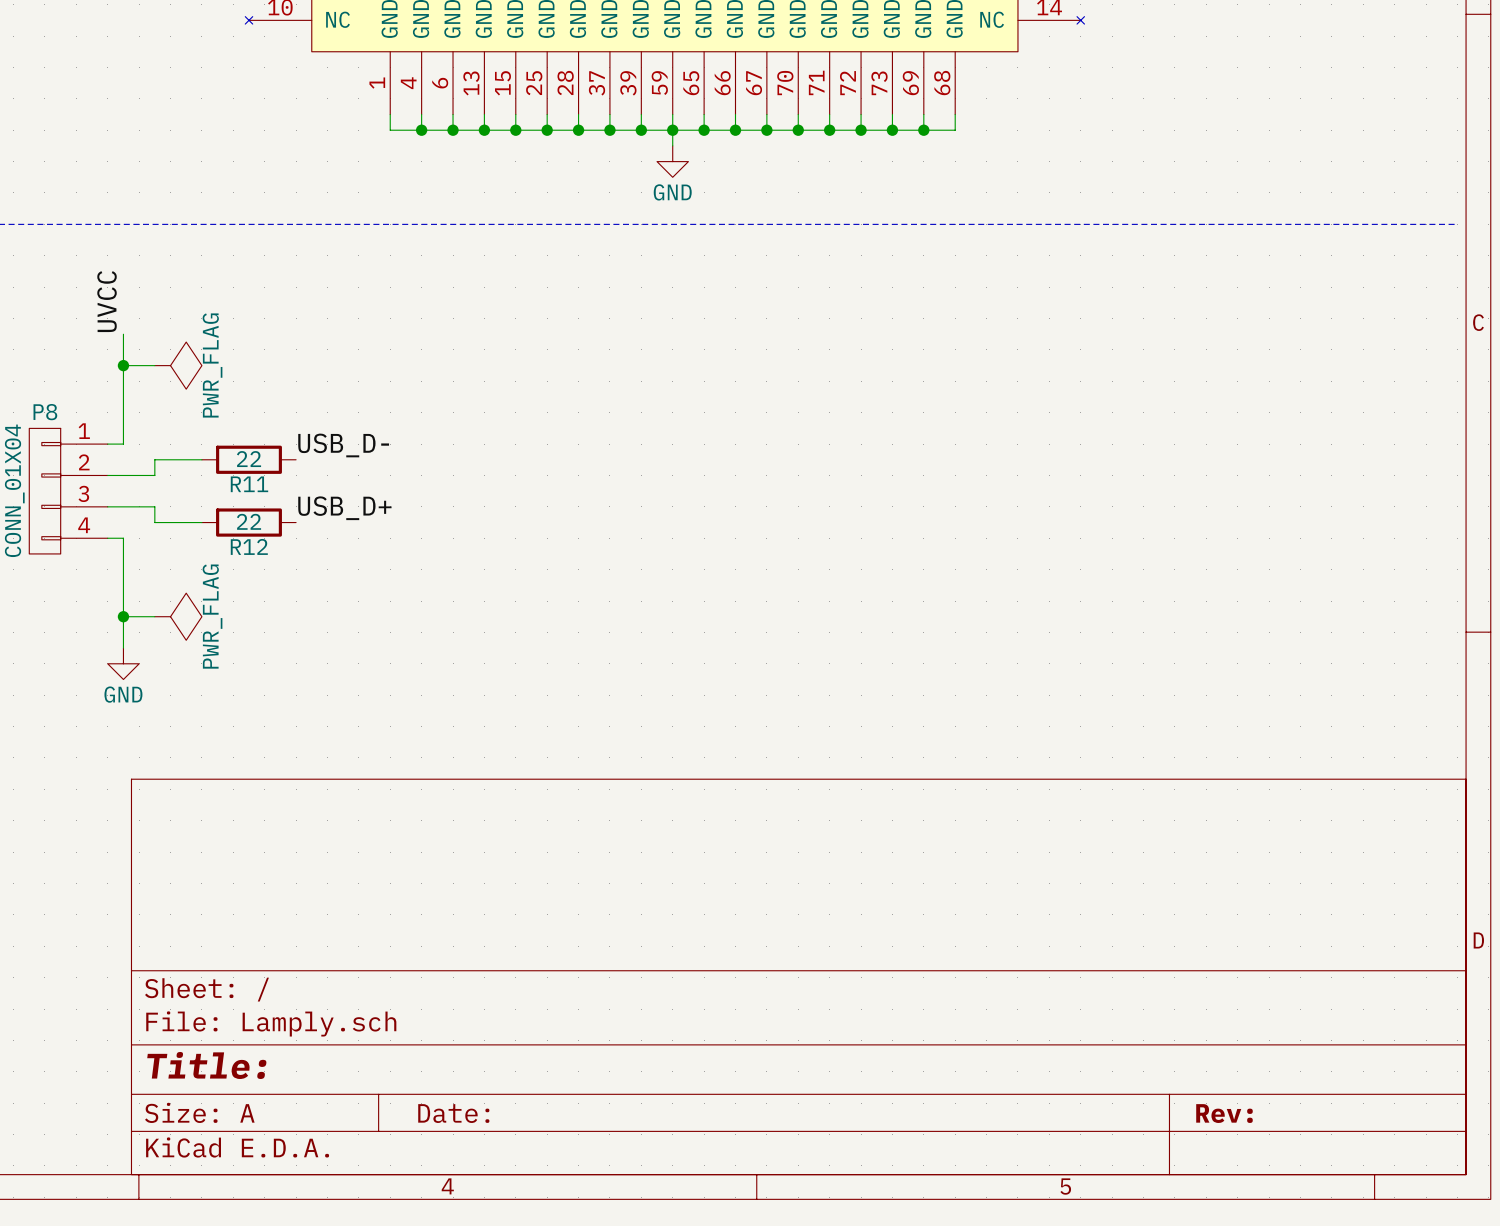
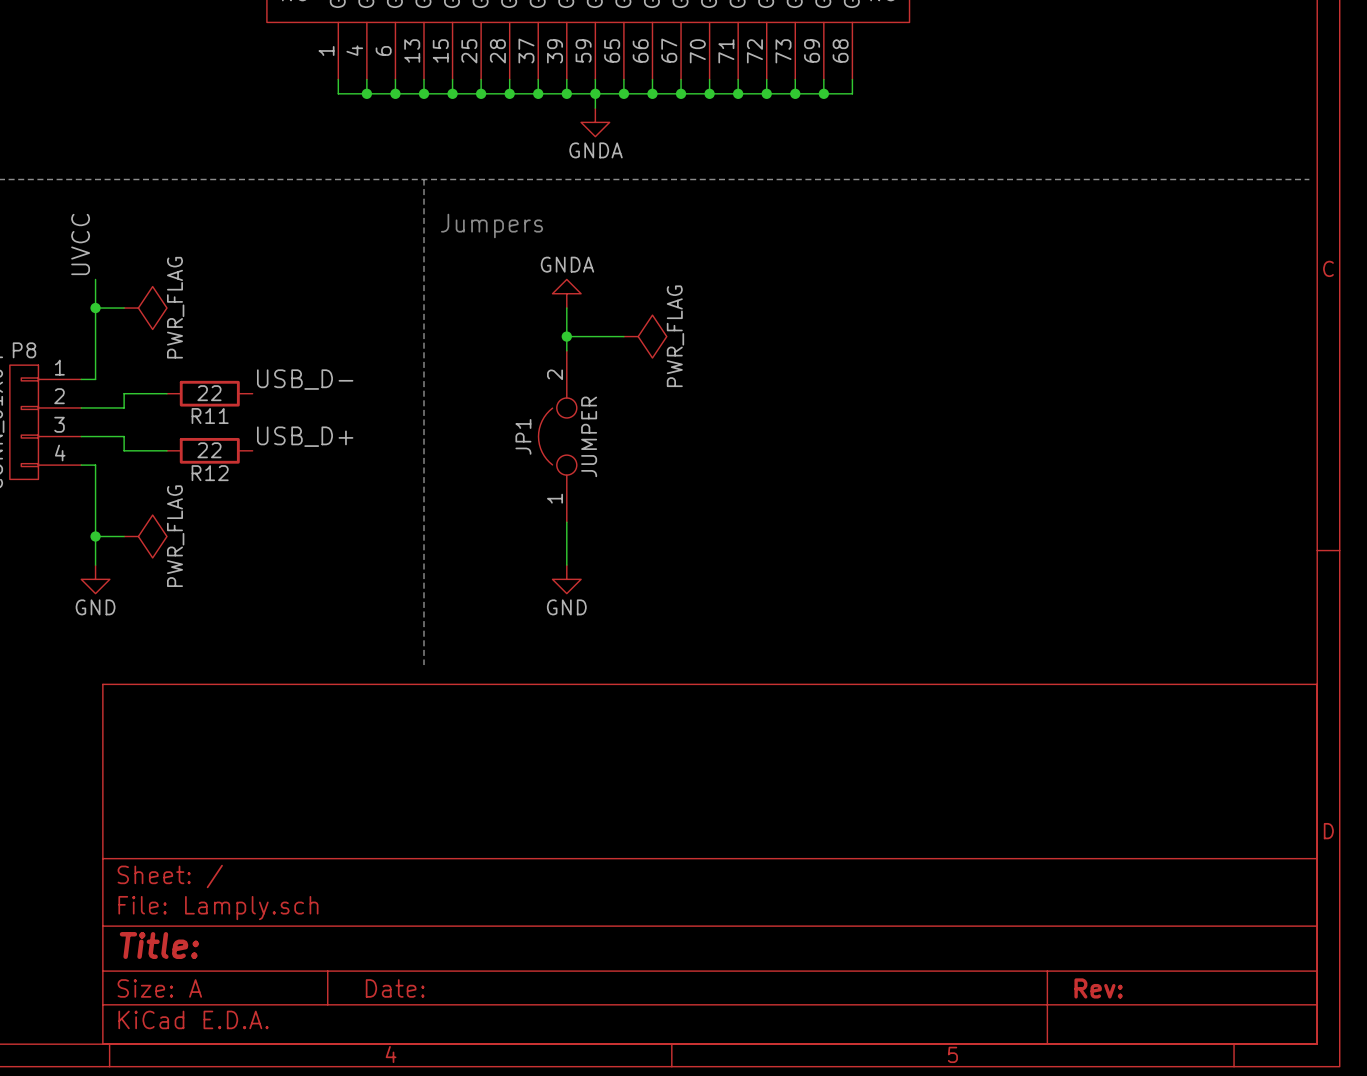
power symbol: GND (672, 161) -> GNDA (595, 122)
line: none -> (424, 179) (424, 665)
text: none -> Jumpers (492, 226)
power symbol: none -> GNDA (566, 293)
wire: none -> (566, 308) (566, 350)
wire: none -> (566, 336) (623, 336)
junction: none -> (566, 336)
power symbol: none -> PWR_FLAG (645, 336)
JP1: none -> JUMPER (557, 436)
wire: none -> (566, 522) (566, 565)
power symbol: none -> GND (566, 579)

